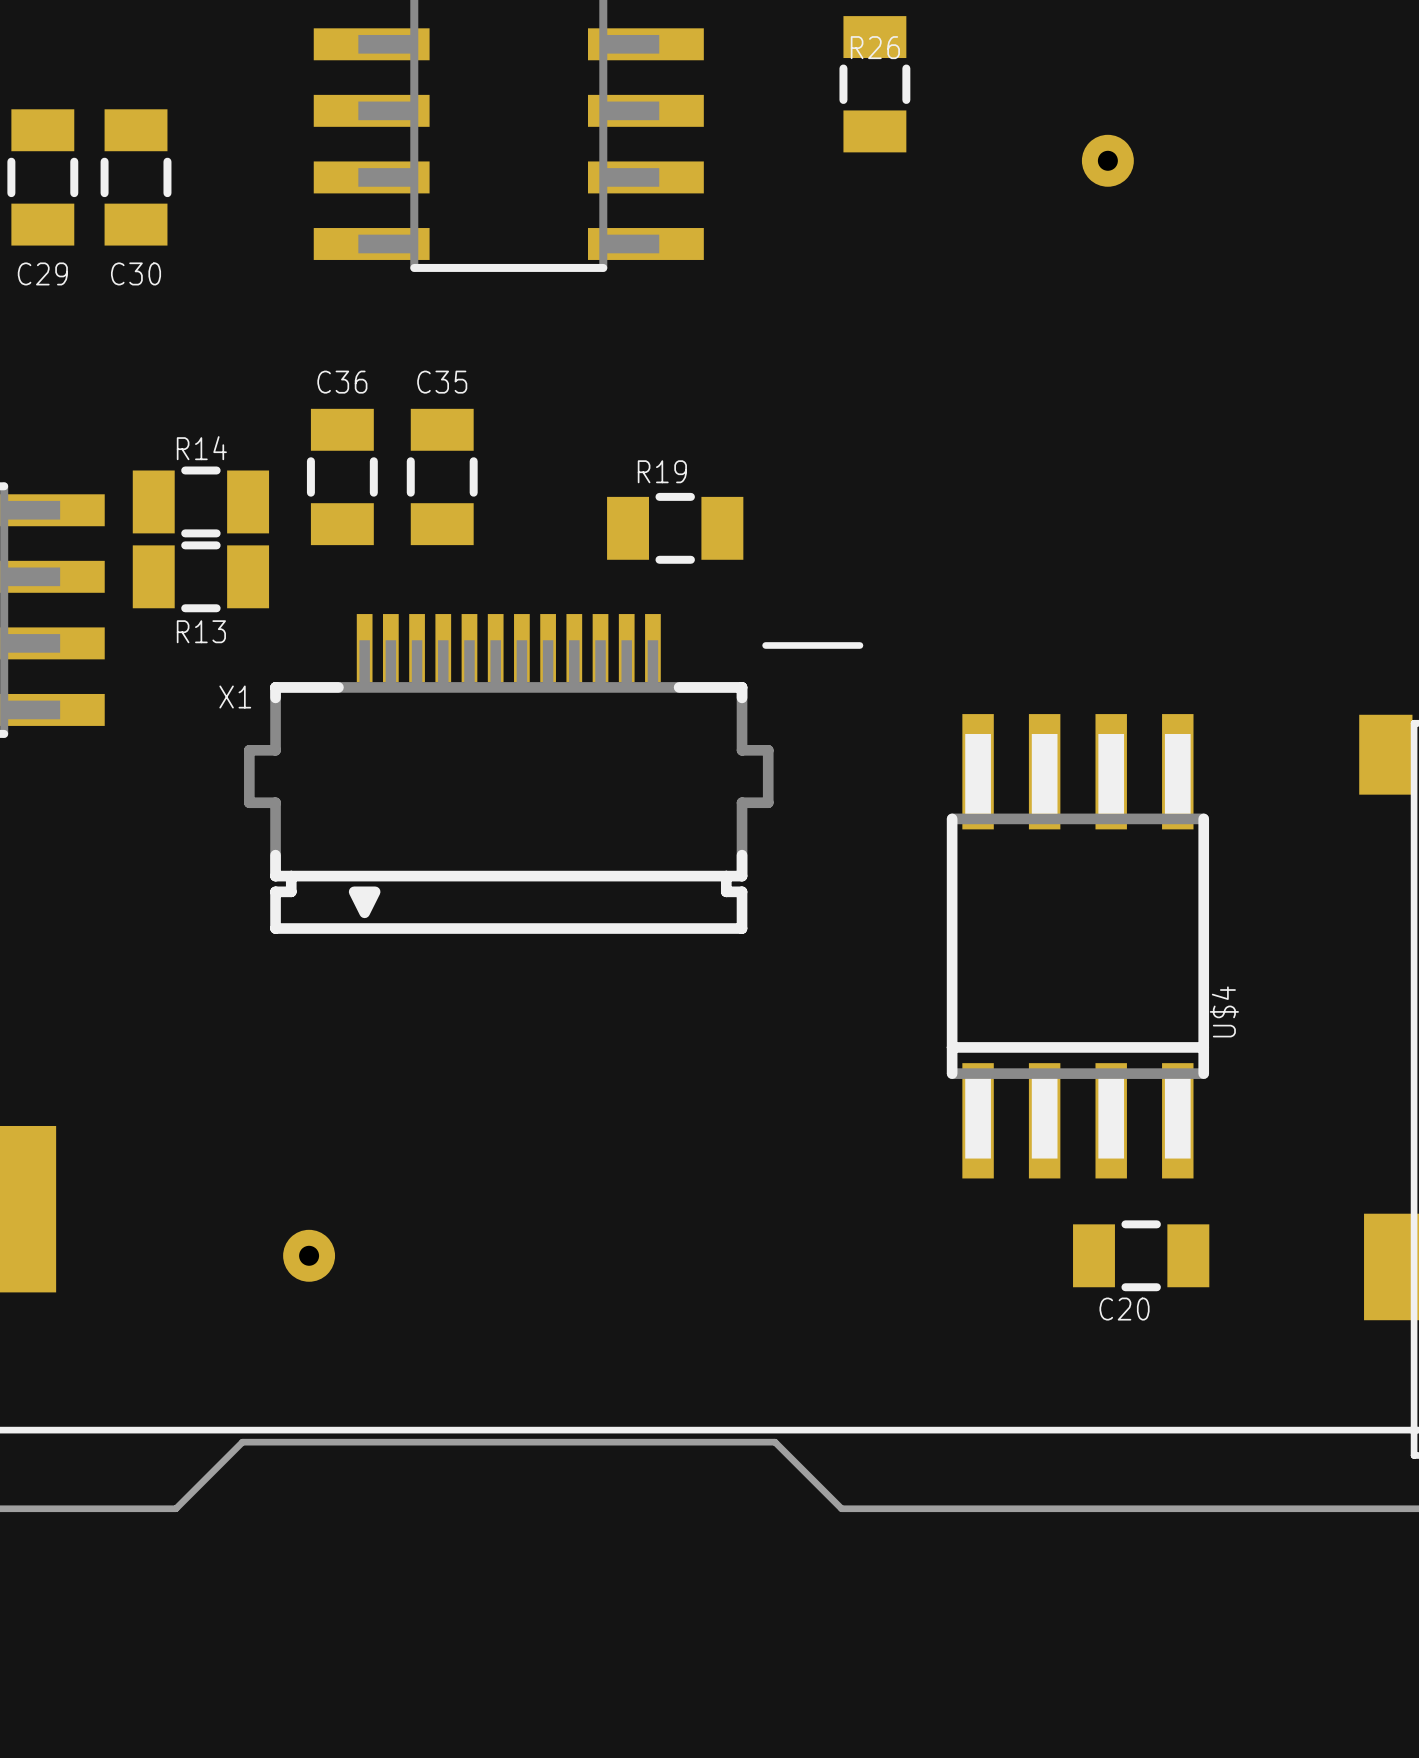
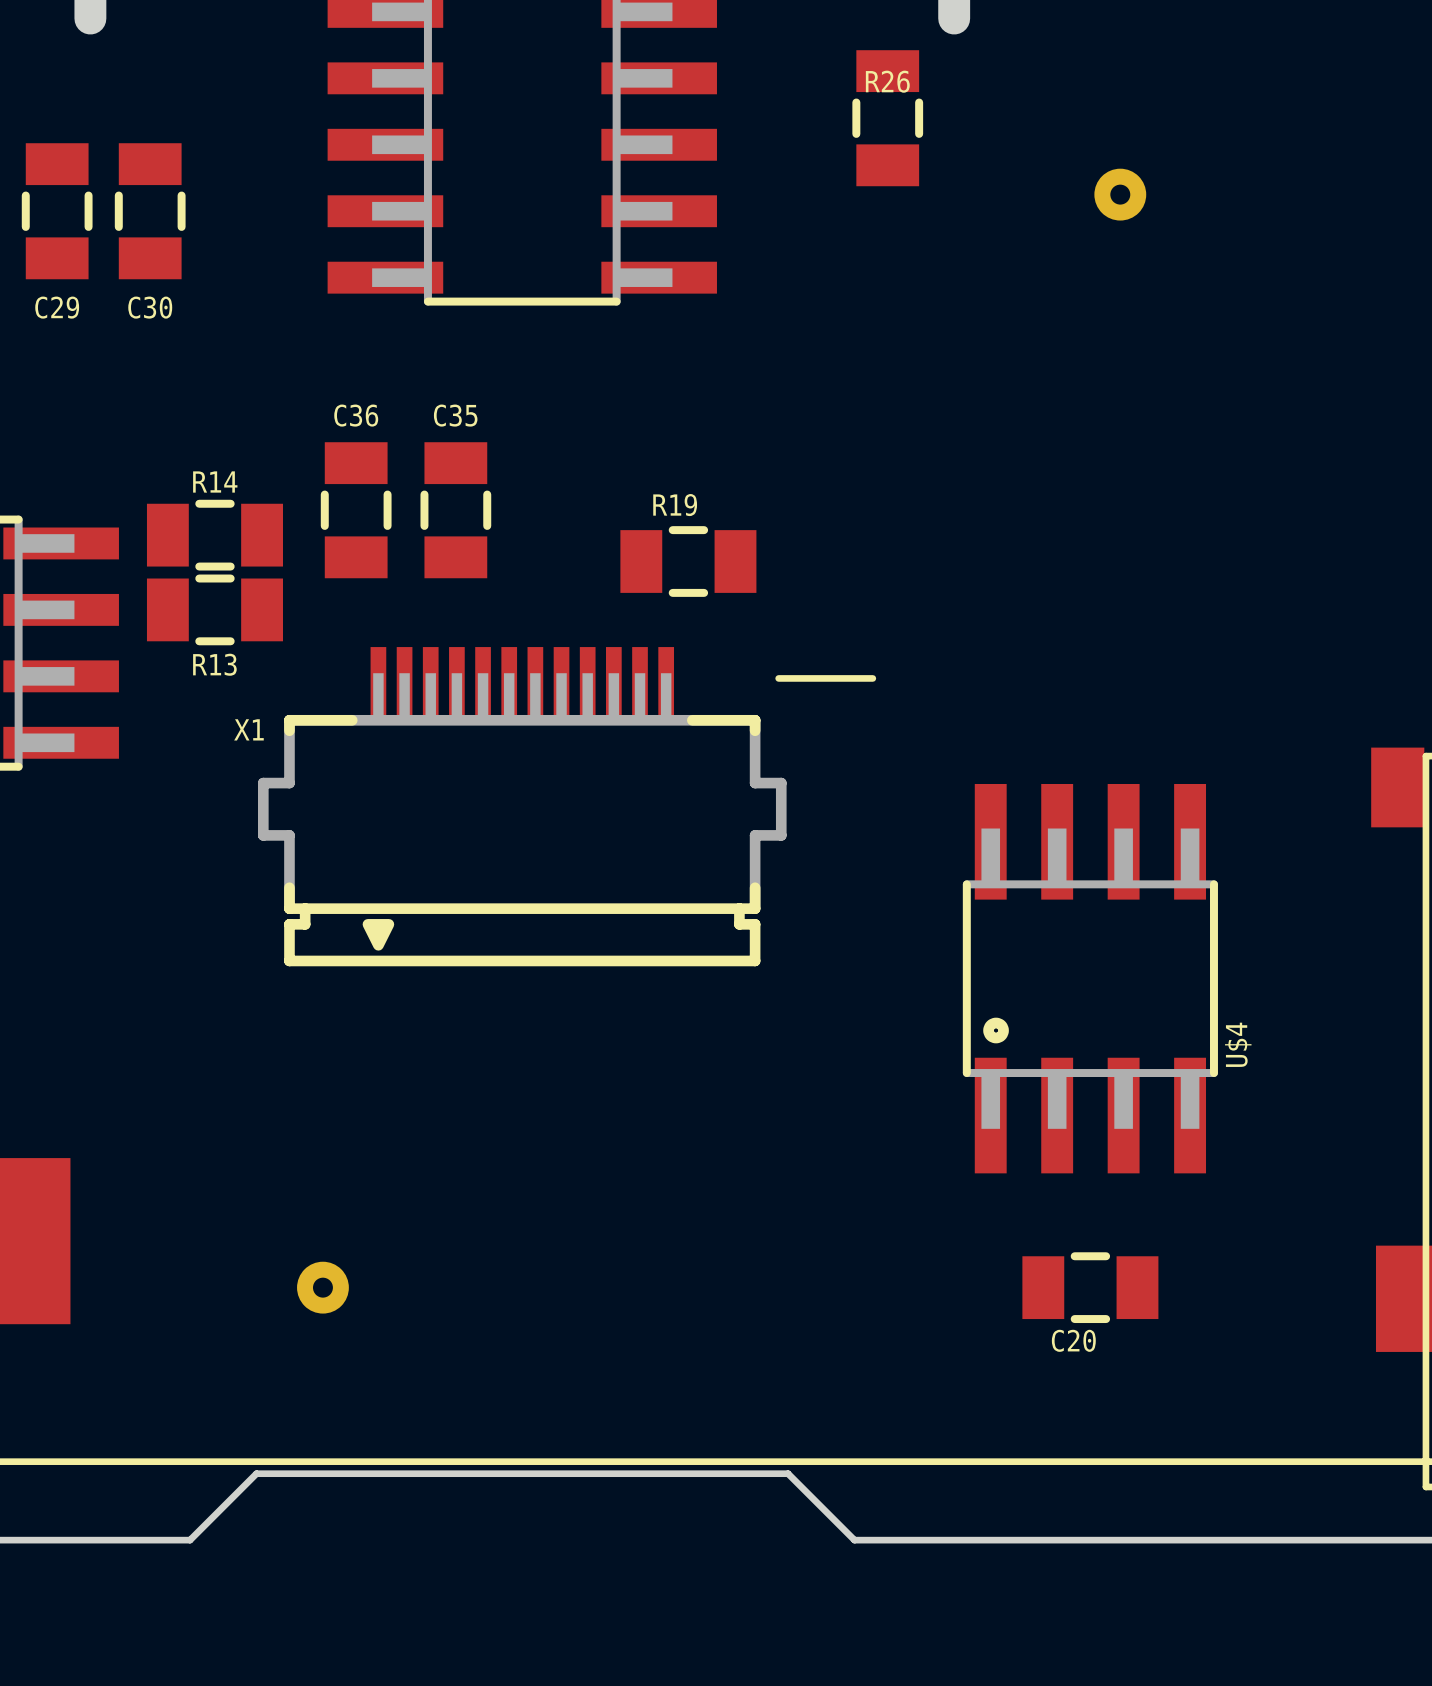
U$4 footprint: [946, 714, 1210, 1179] -> [962, 783, 1218, 1174]
C20 position: (1141, 1255) -> (1090, 1287)

